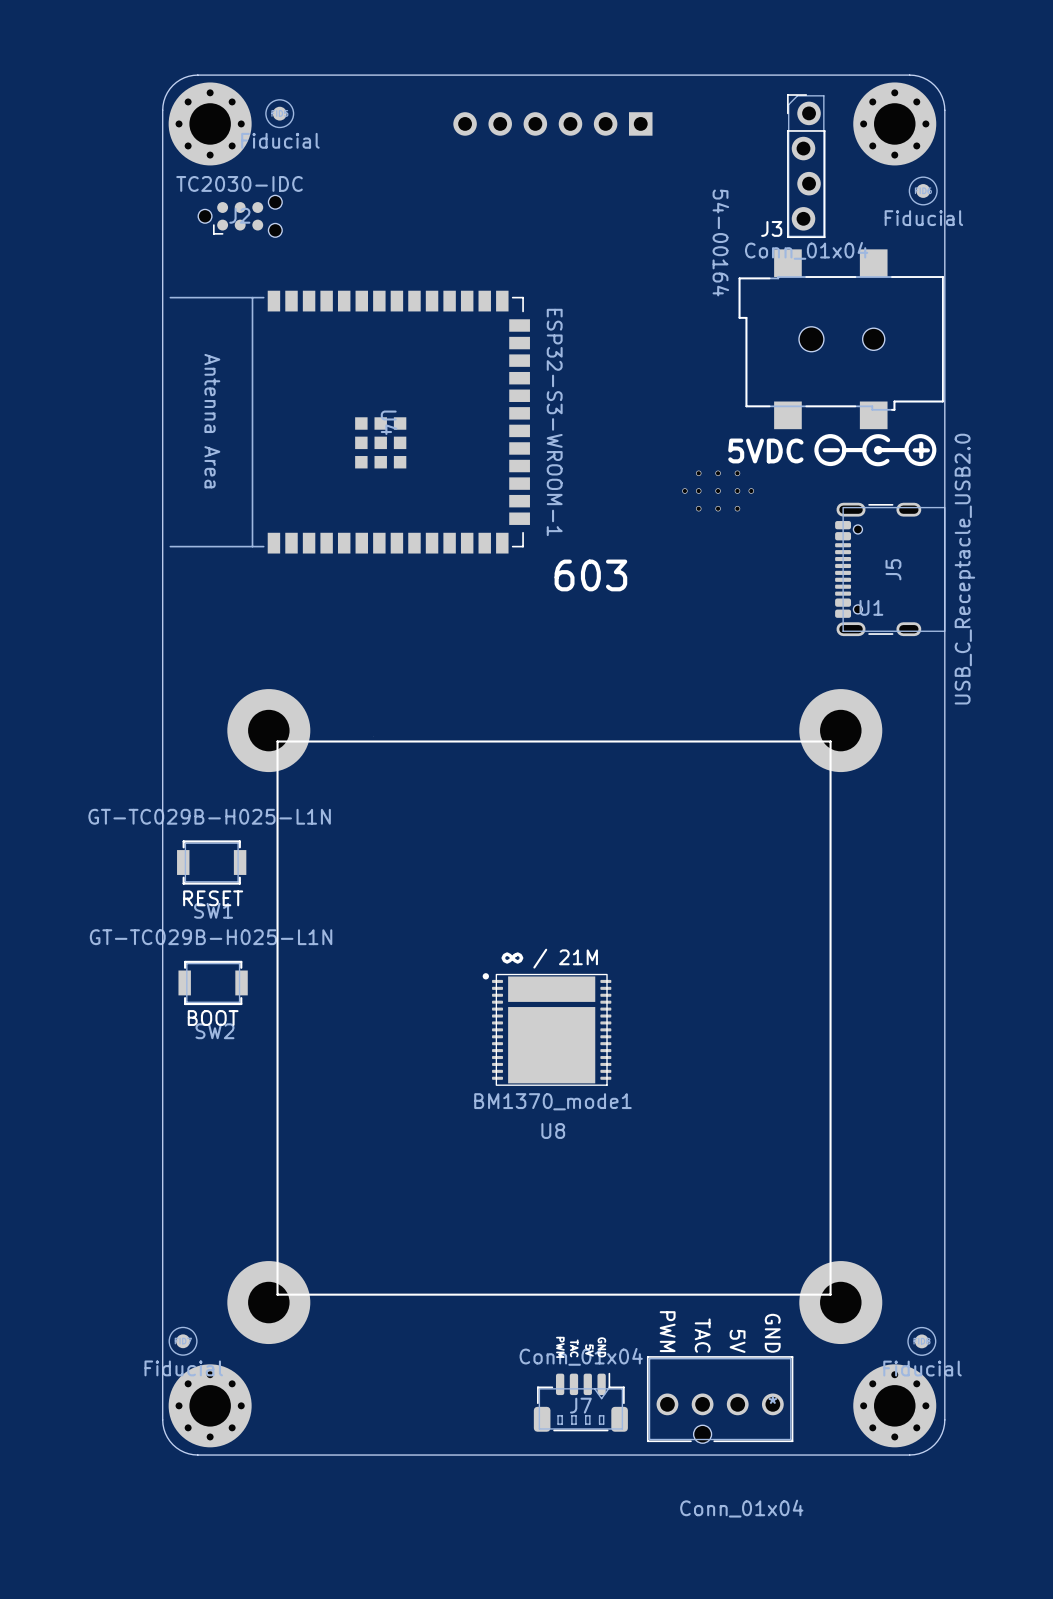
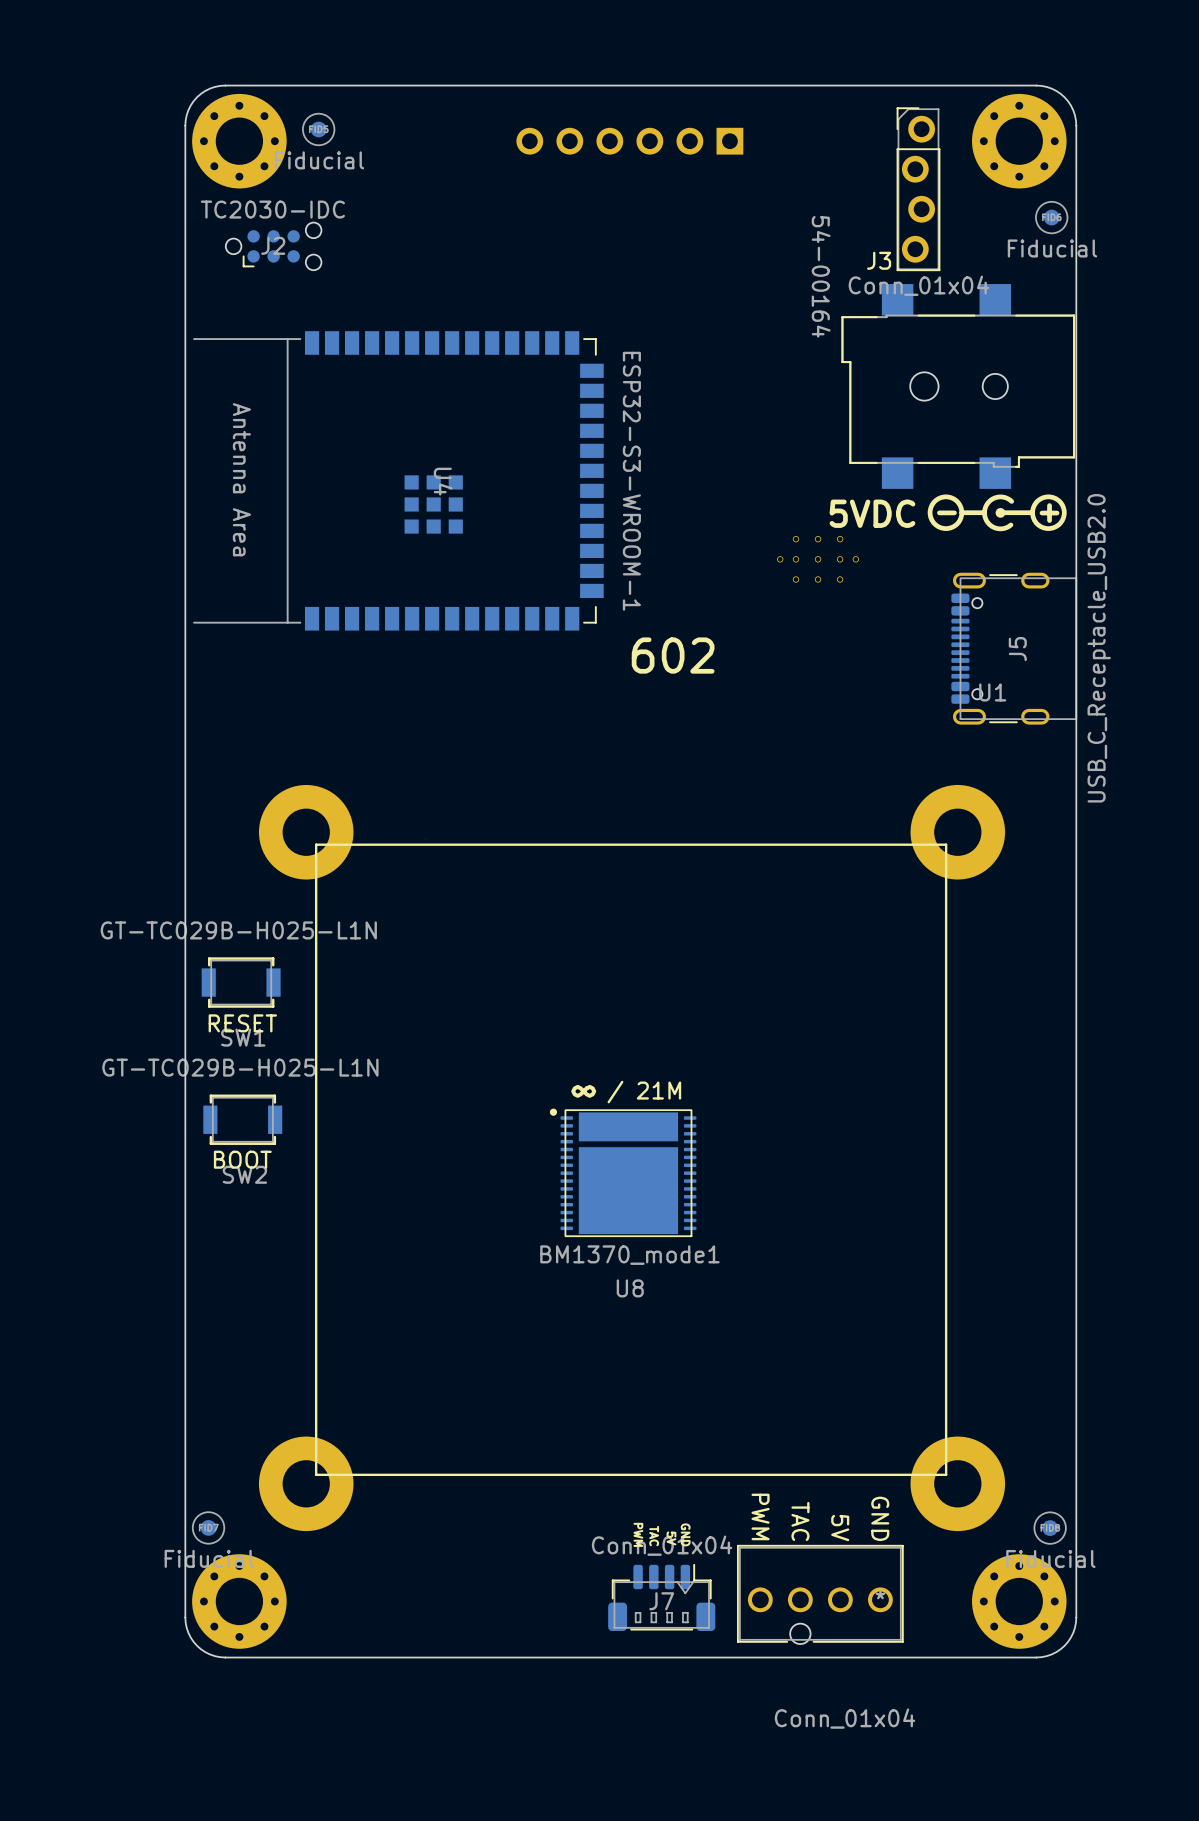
text: 603 (590, 575) -> 602 (673, 655)

